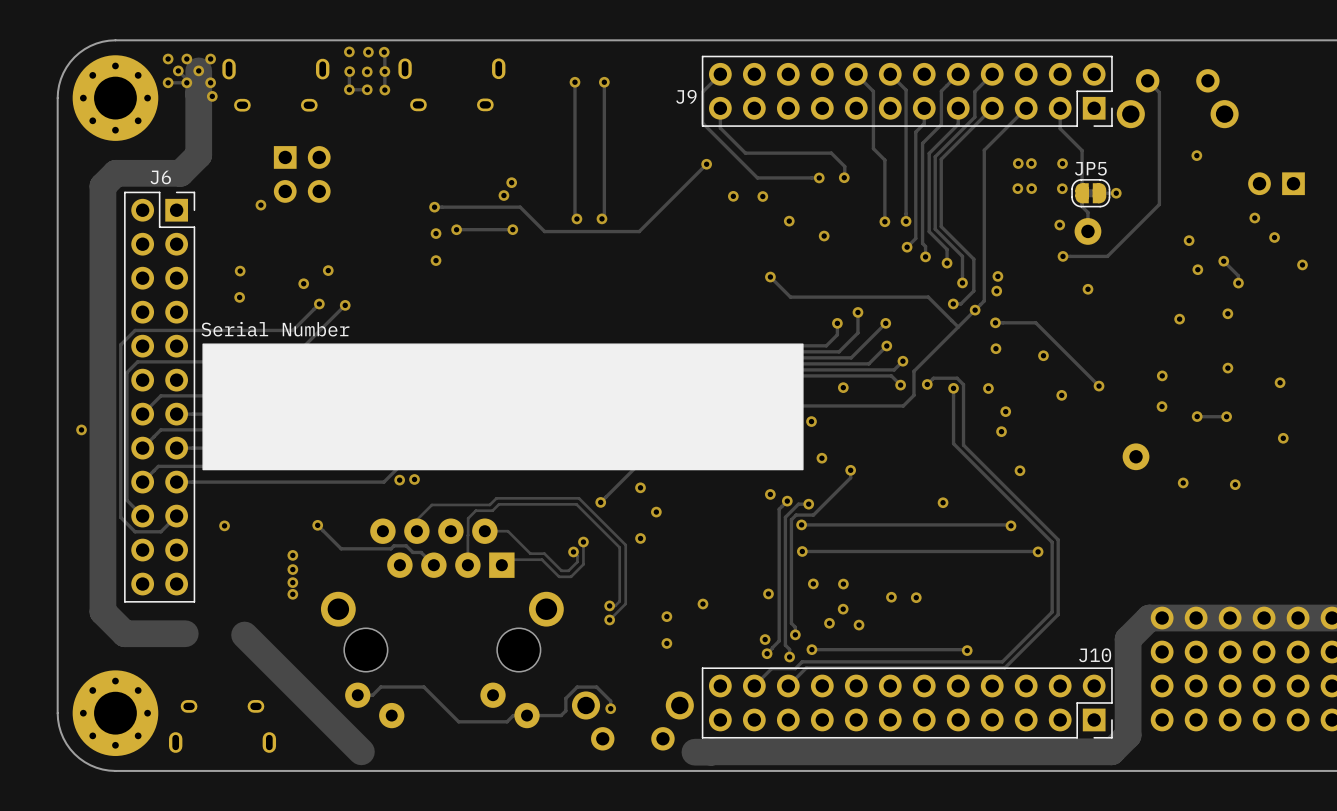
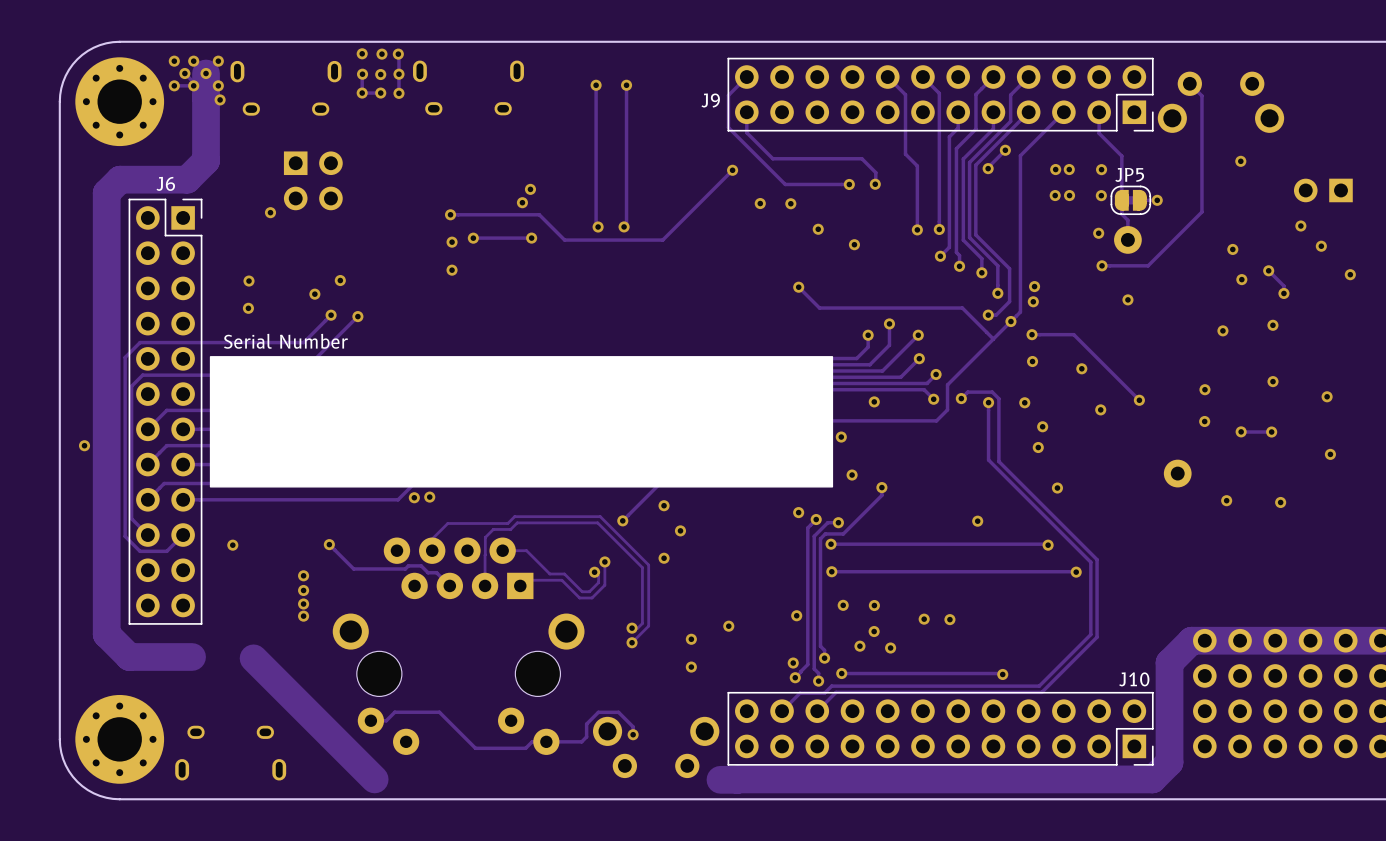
track: none -> (1005, 150) (988, 168)
via: none -> (1005, 150)
via: none -> (988, 168)

